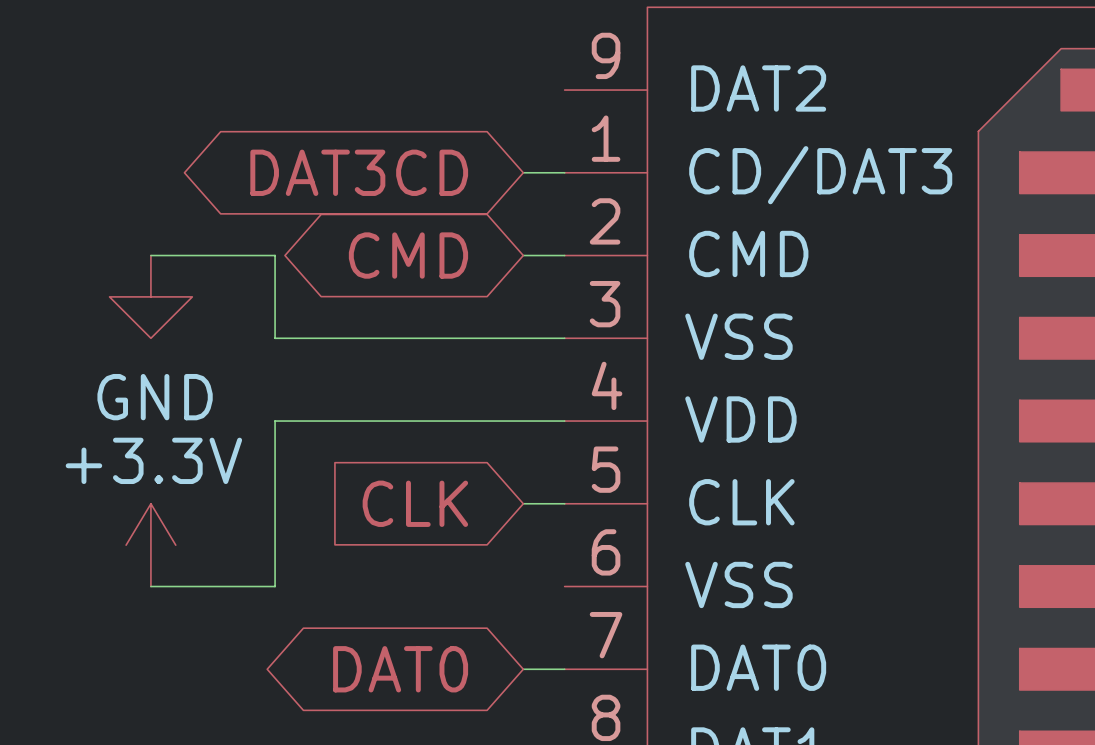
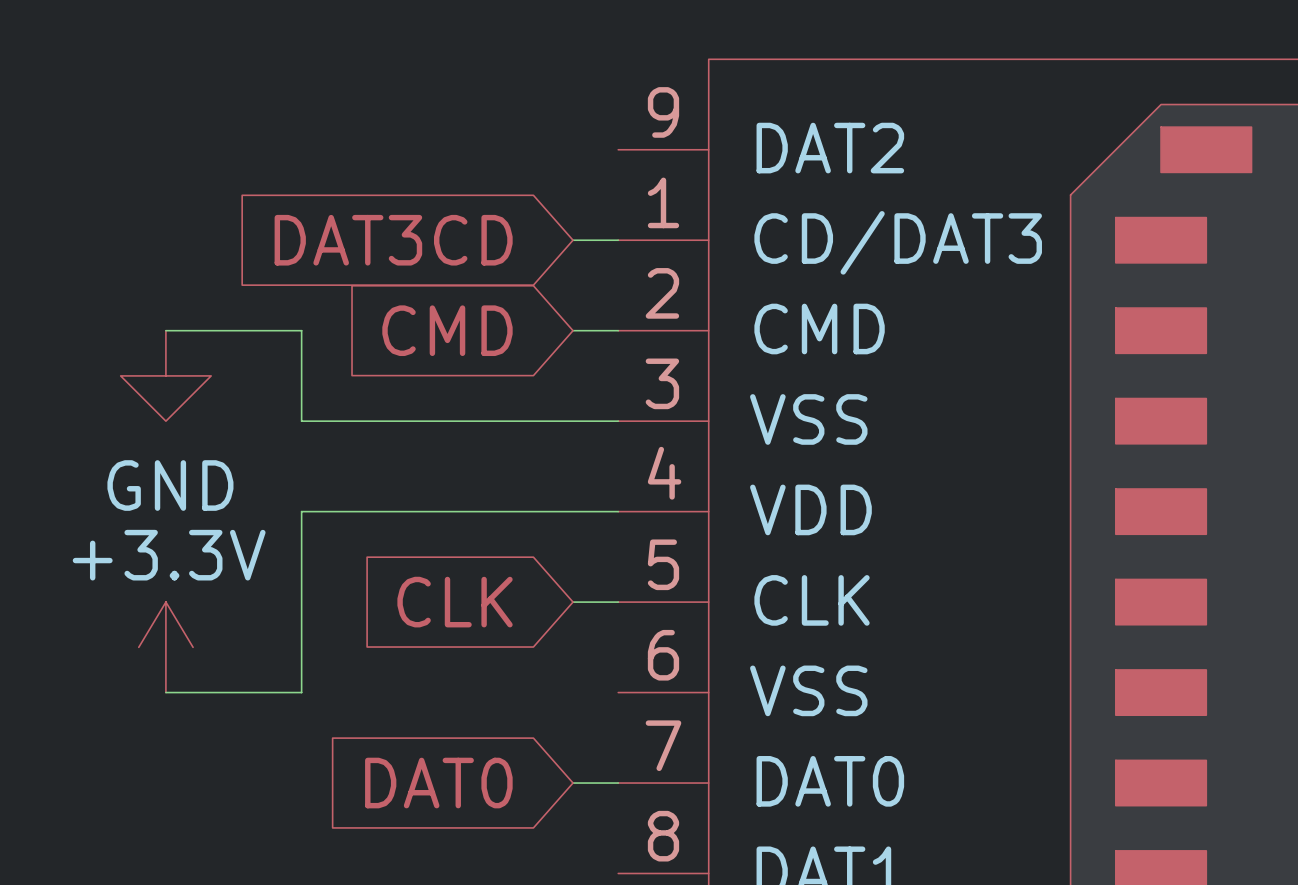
global label shape: bidirectional (359, 172) -> input (393, 240)
global label shape: bidirectional (408, 255) -> input (447, 330)
global label shape: bidirectional (400, 669) -> input (438, 783)

